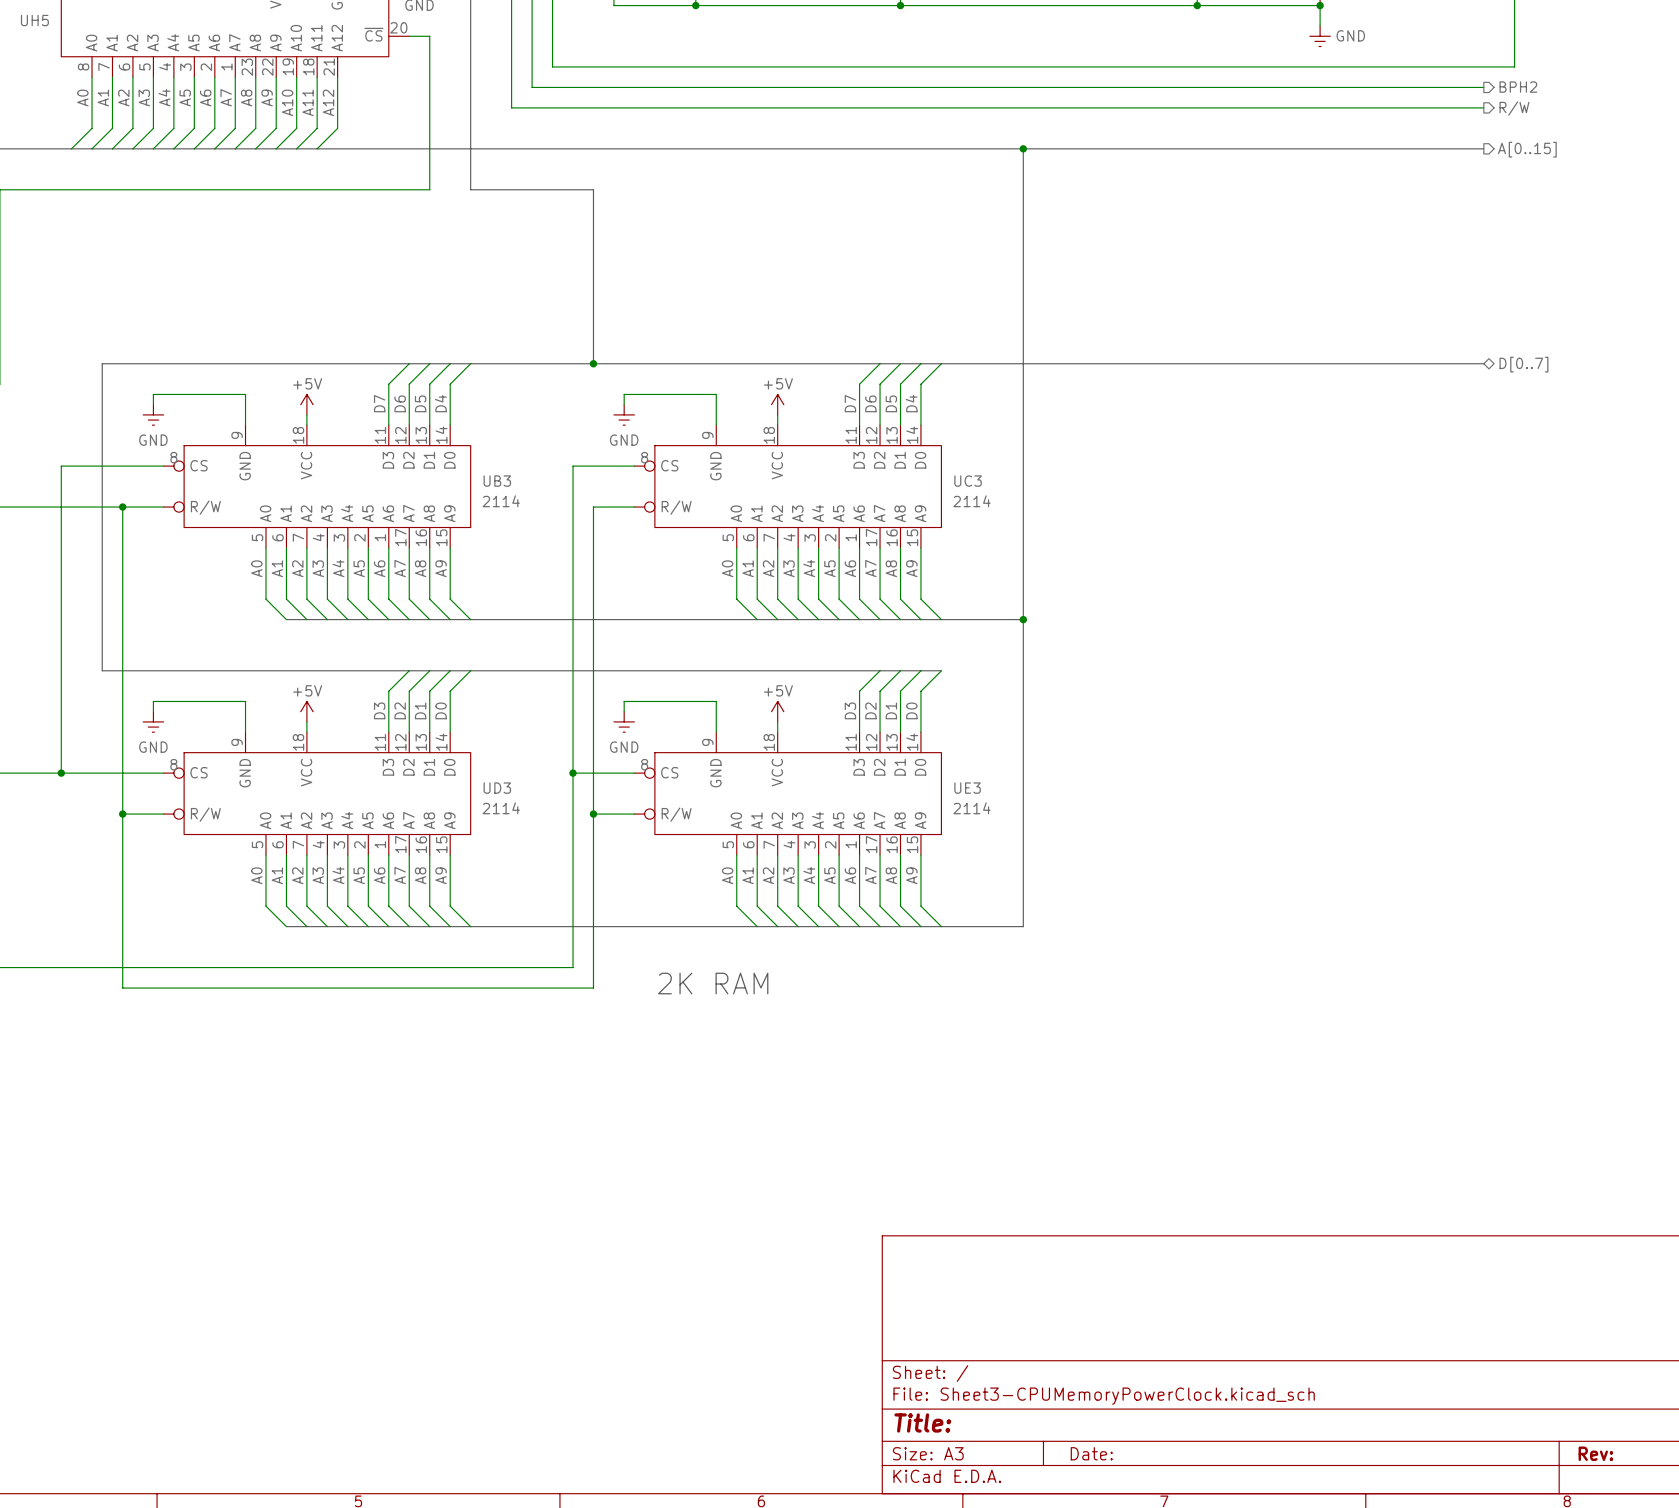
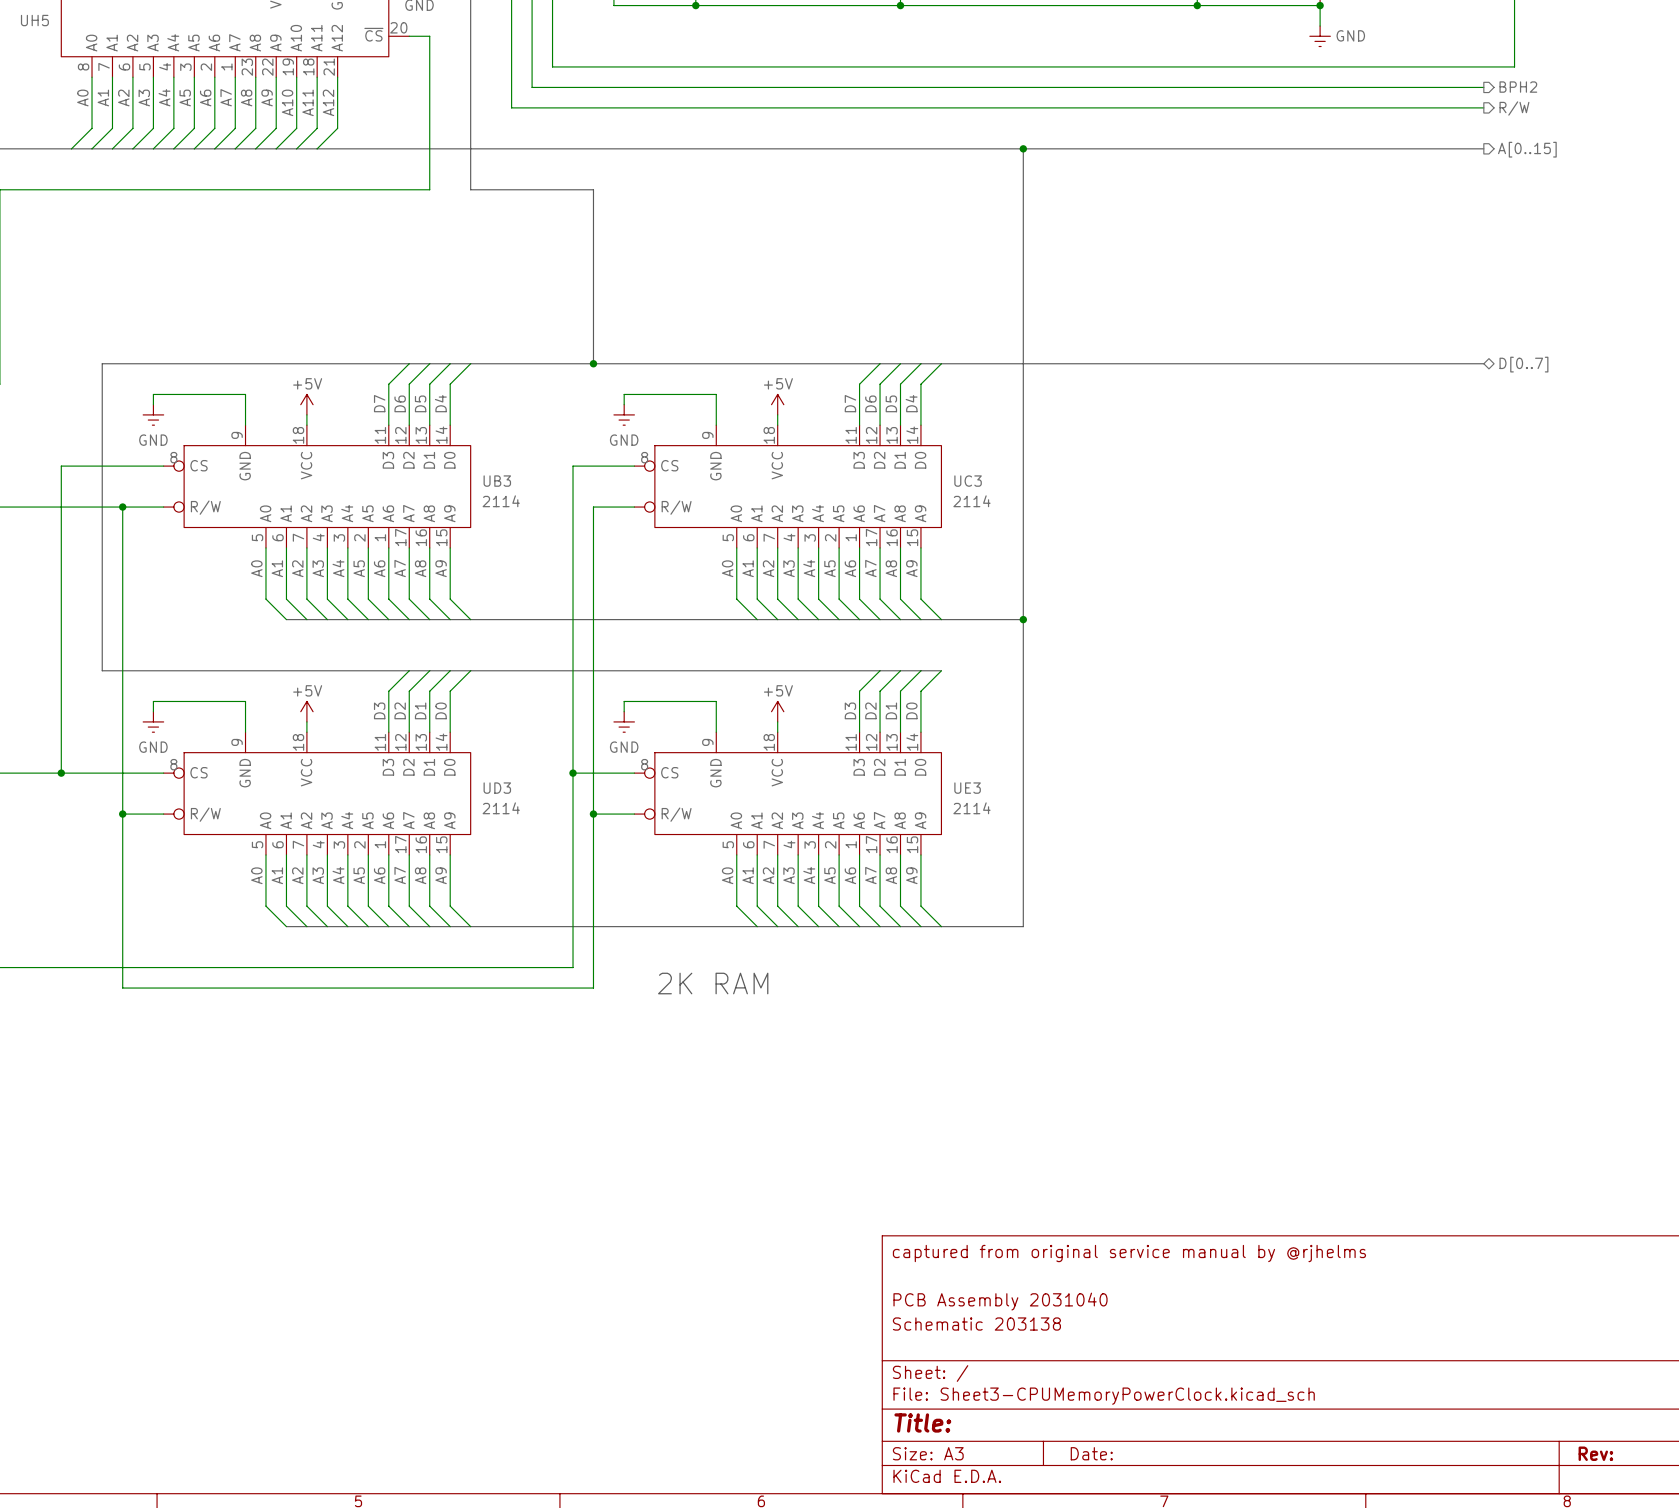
title block: none -> captured from original service manual by @rjhelms (1129, 1253)
title block: none -> PCB Assembly 2031040 (1000, 1301)
title block: none -> Schematic 203138 (976, 1324)

